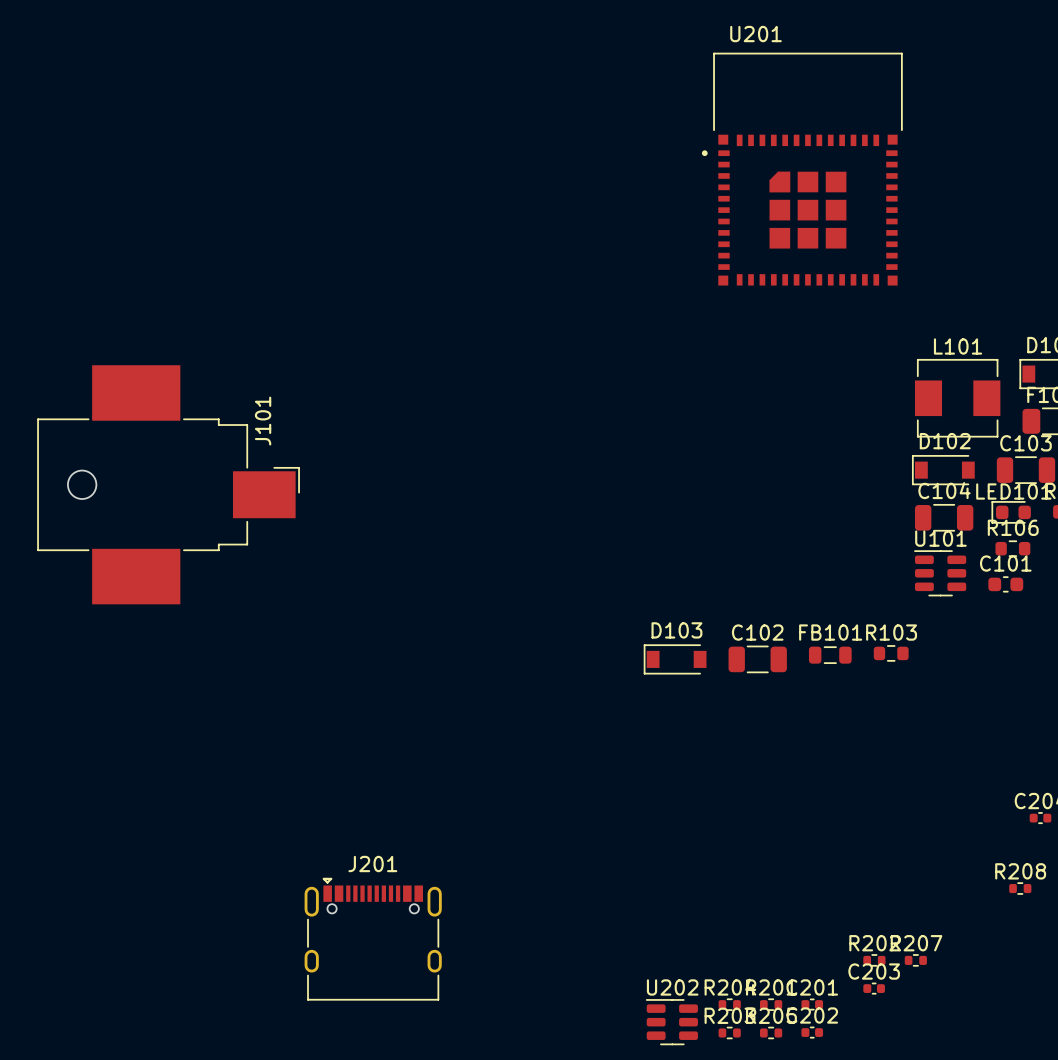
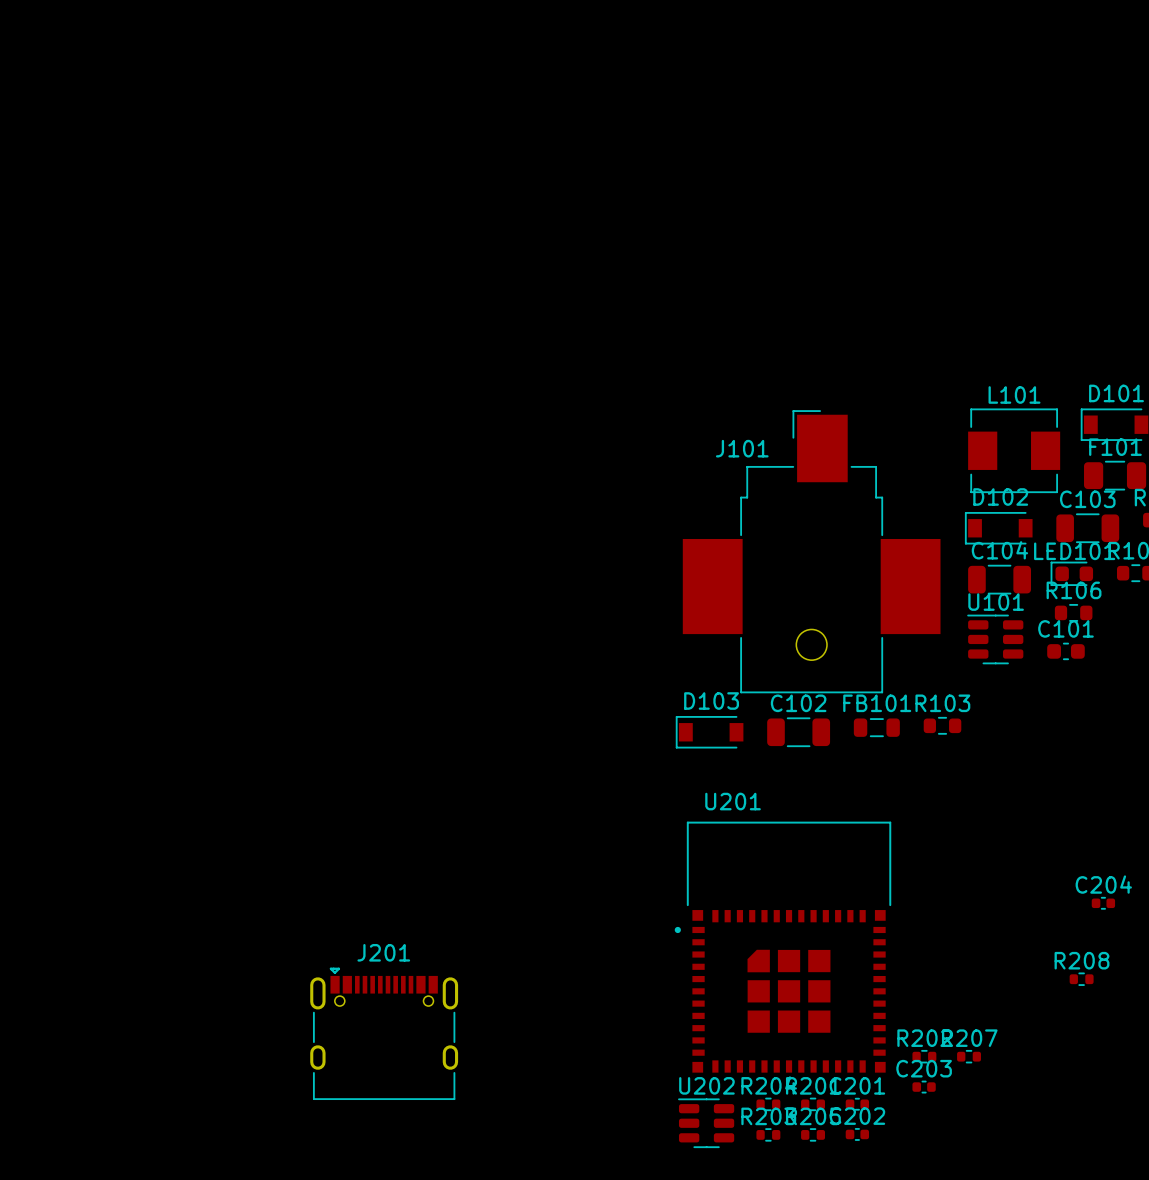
U201 position: (802, 169) -> (783, 947)
J101 rotation: 0° (168, 484) -> 90° counterclockwise (811, 551)
J101 position: (168, 484) -> (811, 551)

